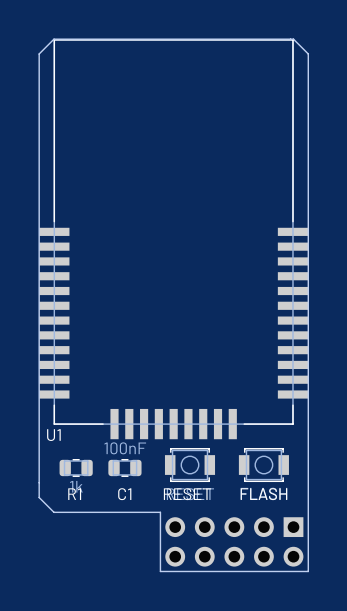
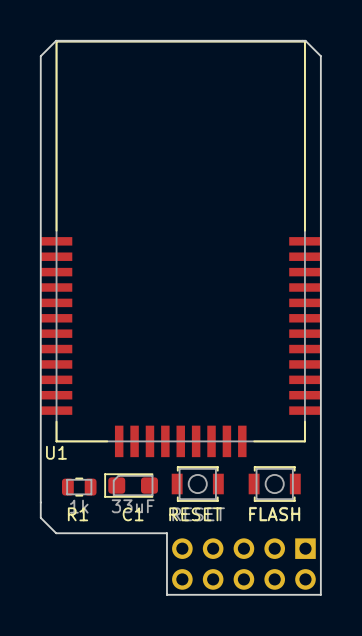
C1 value: 100nF (125, 448) -> 33uF (133, 506)
C1 footprint: [108, 459, 142, 477] -> [104, 473, 158, 498]

